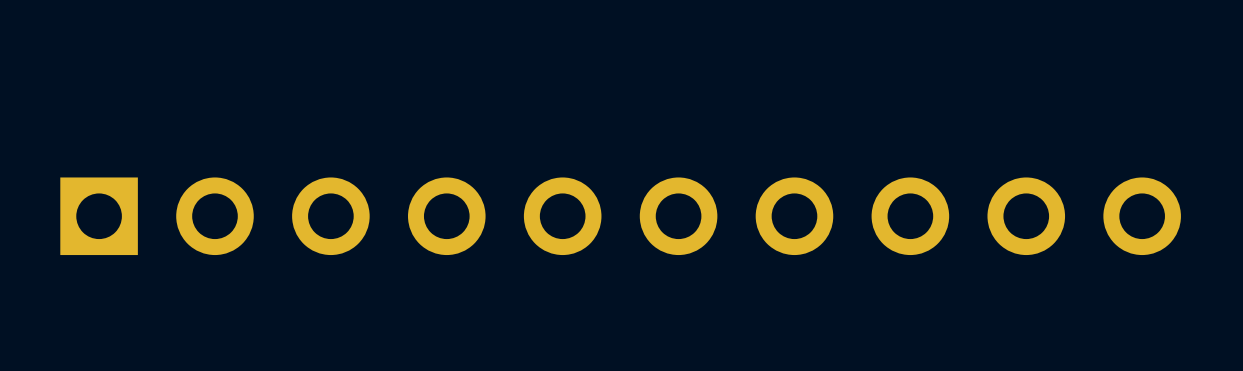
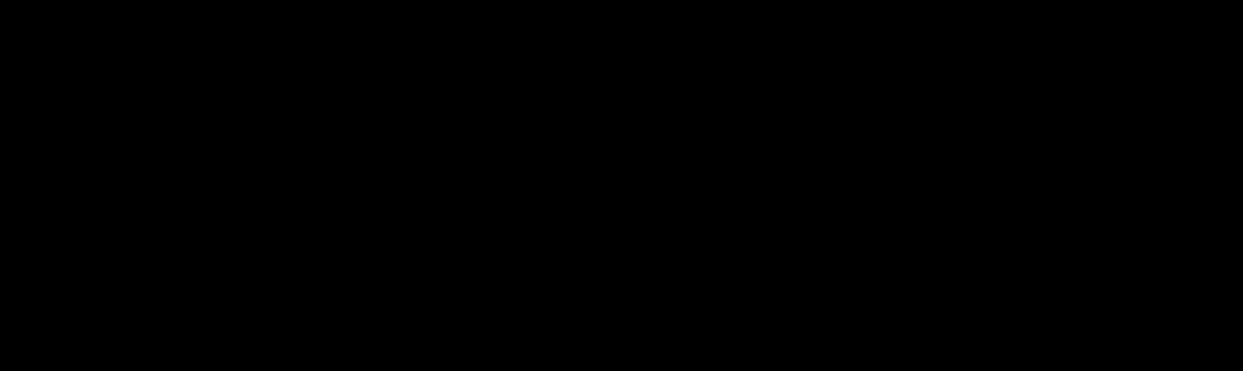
part: (620, 216) -> none

